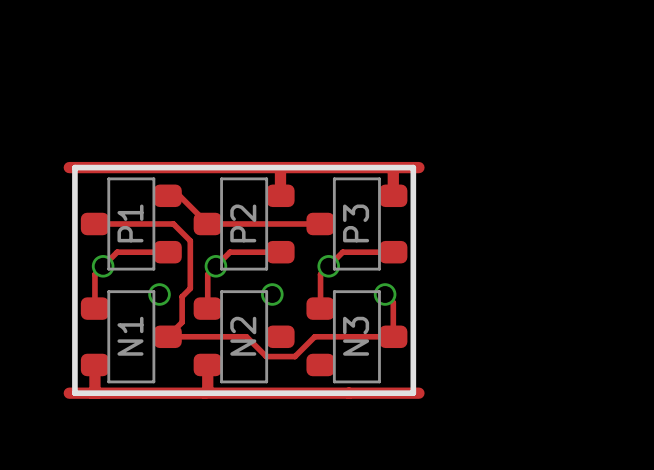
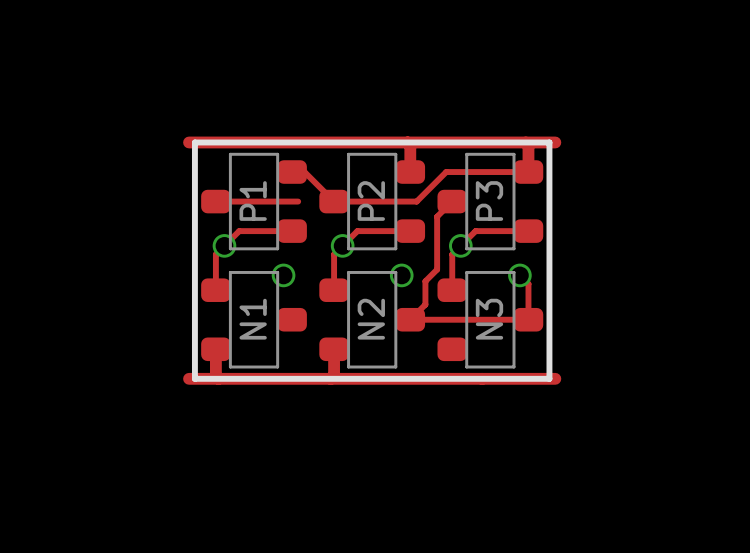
top track: (173, 223) (190, 240) (190, 288) (182, 296) (182, 322) (167, 336) (246, 336) (266, 356) (294, 356) (314, 336) -> (452, 201) (437, 216) (437, 269) (425, 281) (425, 304) (410, 319) (446, 319)
top track: (286, 223) (320, 223) -> (416, 201) (446, 172) (528, 172)

